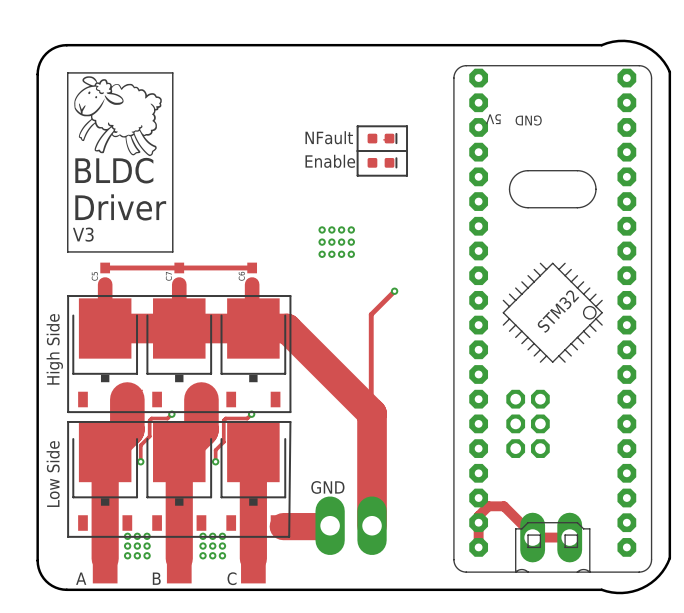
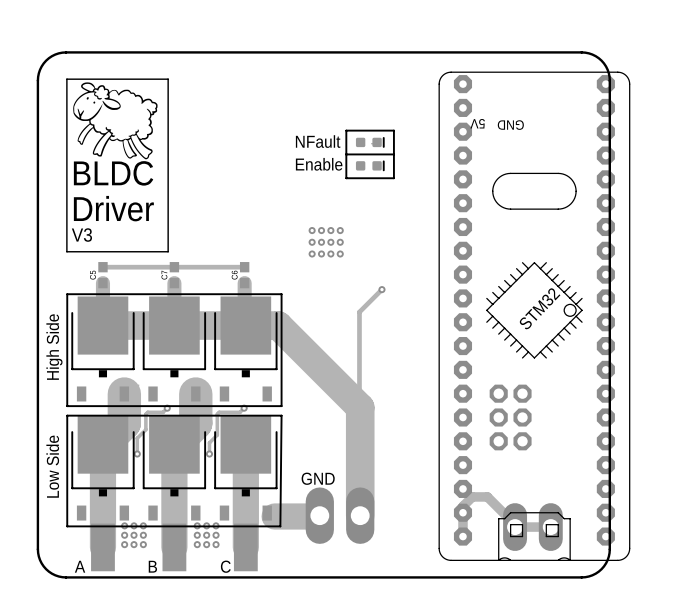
board edge: (601, 45) (618, 41) (641, 44) (660, 57) (669, 71) (669, 558) (659, 575) (642, 588) (622, 592) (601, 589) -> (581, 52) (592, 54) (601, 60) (607, 69) (609, 80) (609, 549) (607, 560) (601, 569) (592, 575) (581, 577)

